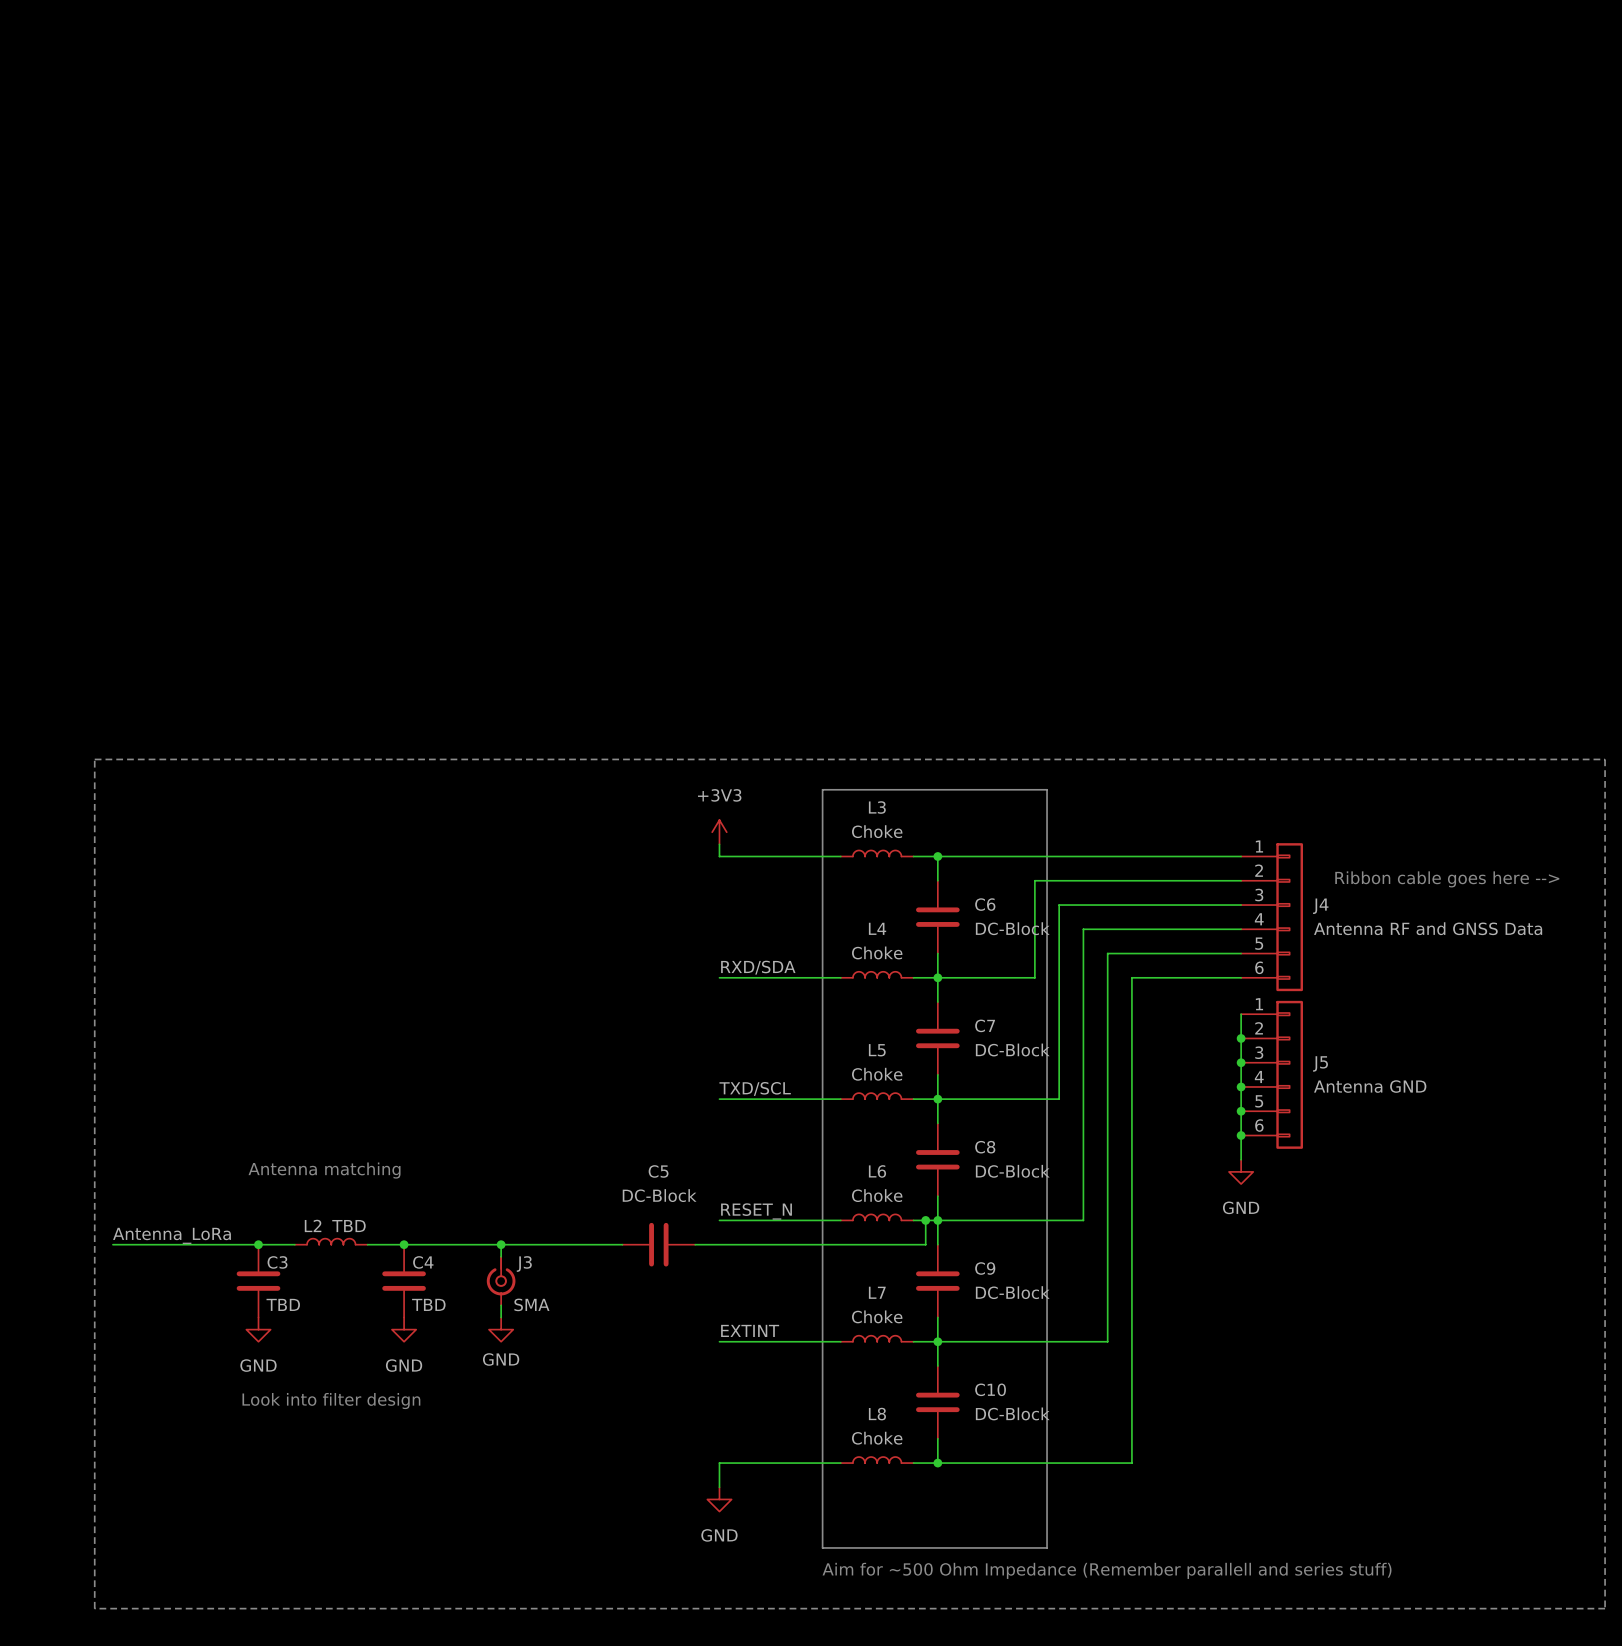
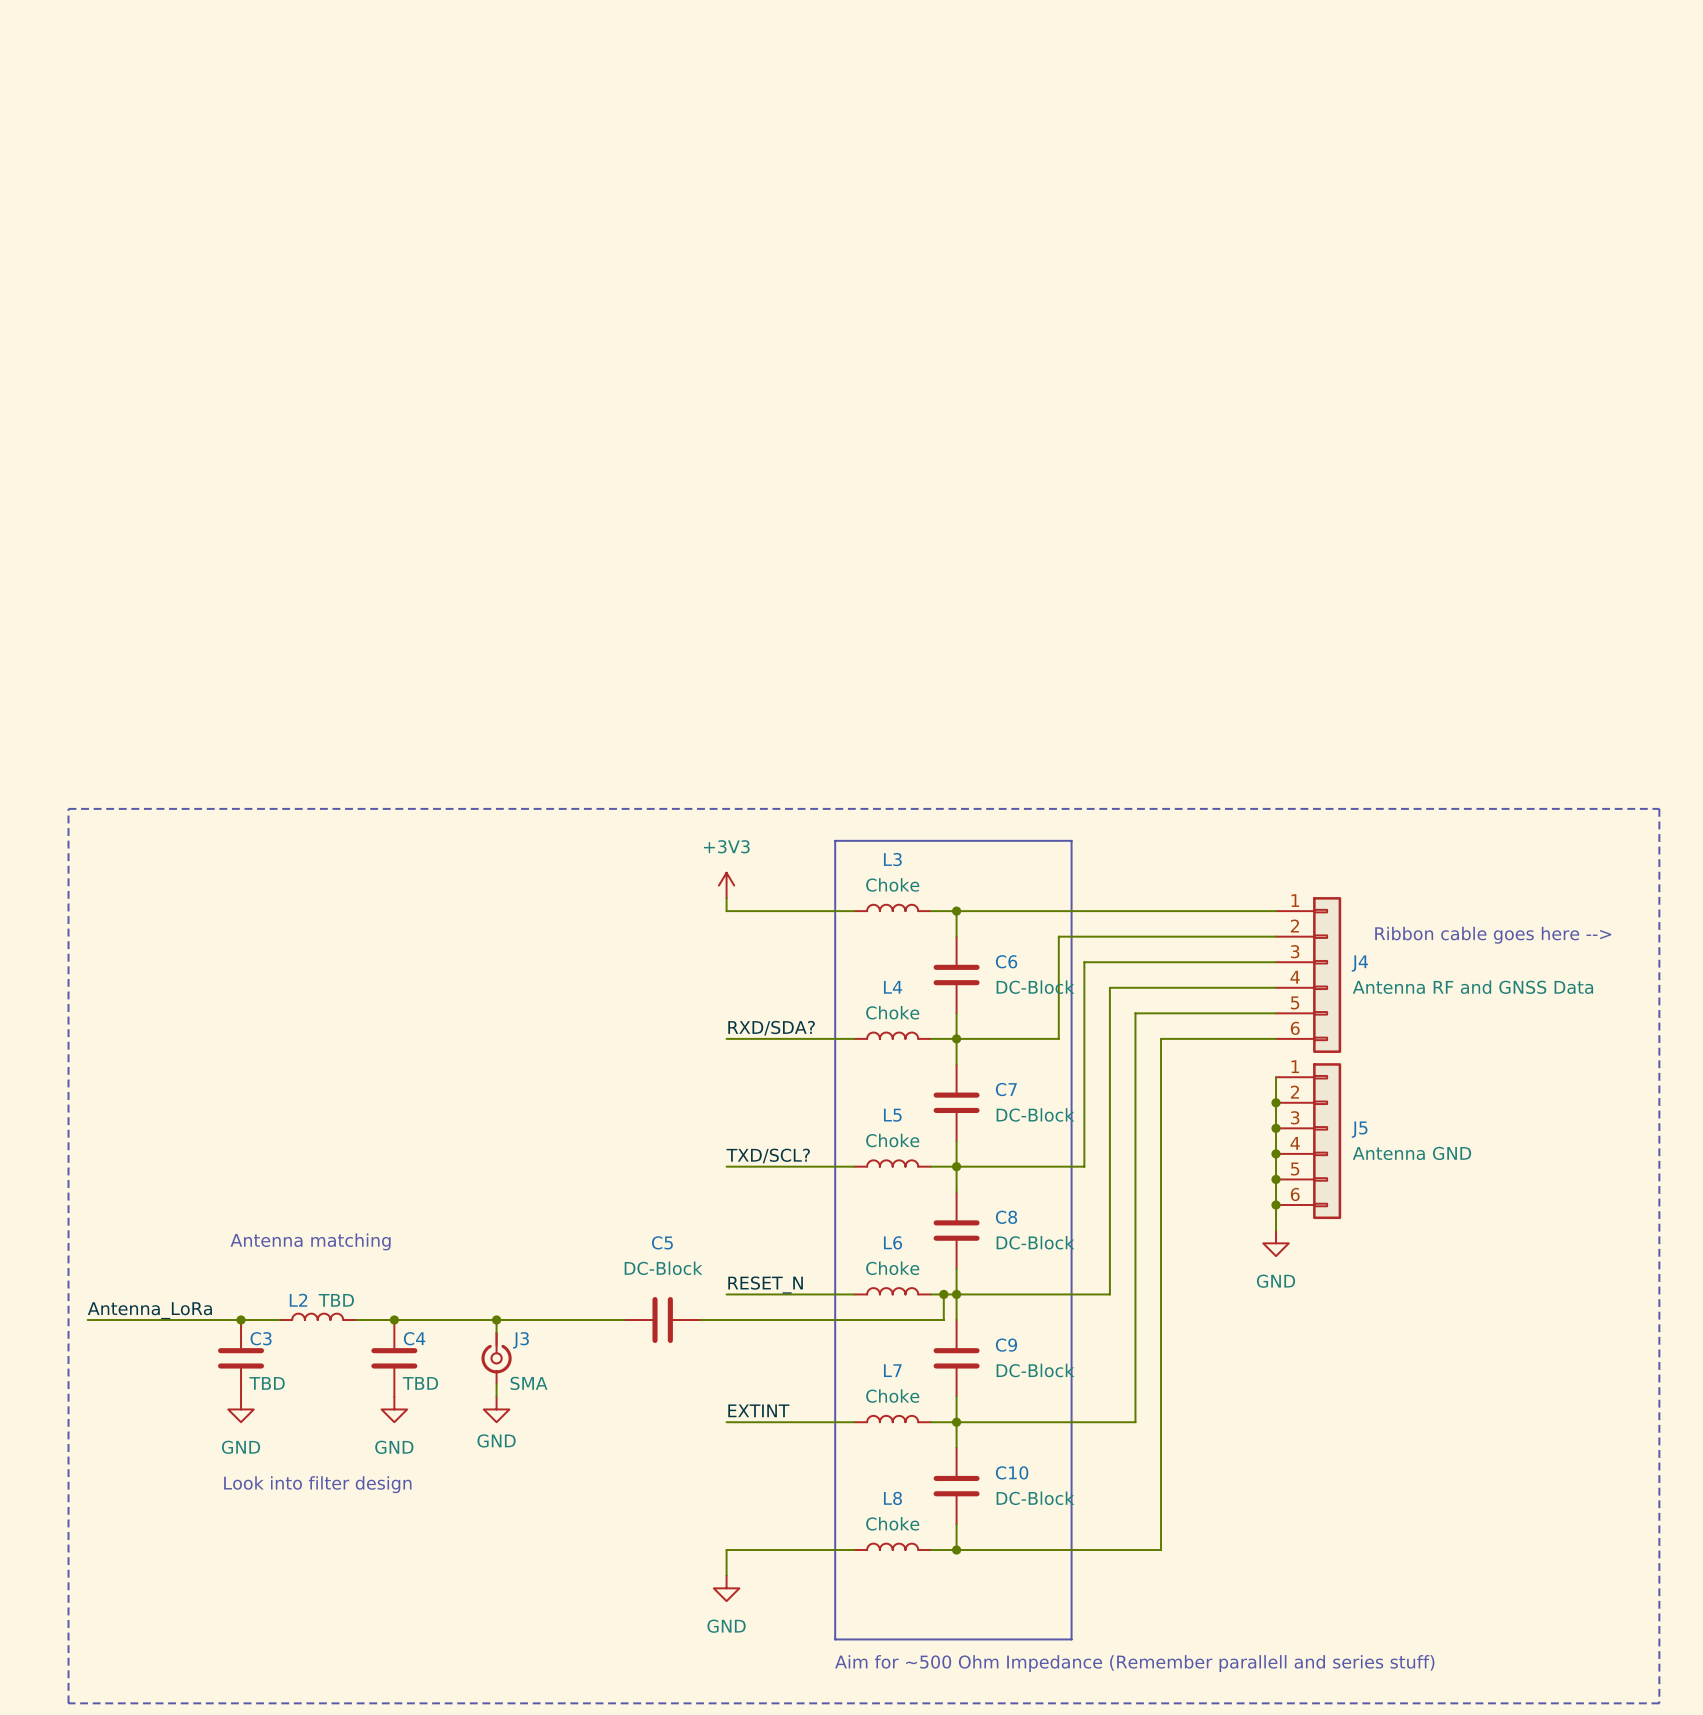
label: RXD/SDA (758, 967) -> RXD/SDA? (771, 1028)
label: TXD/SCL (755, 1088) -> TXD/SCL? (768, 1155)

